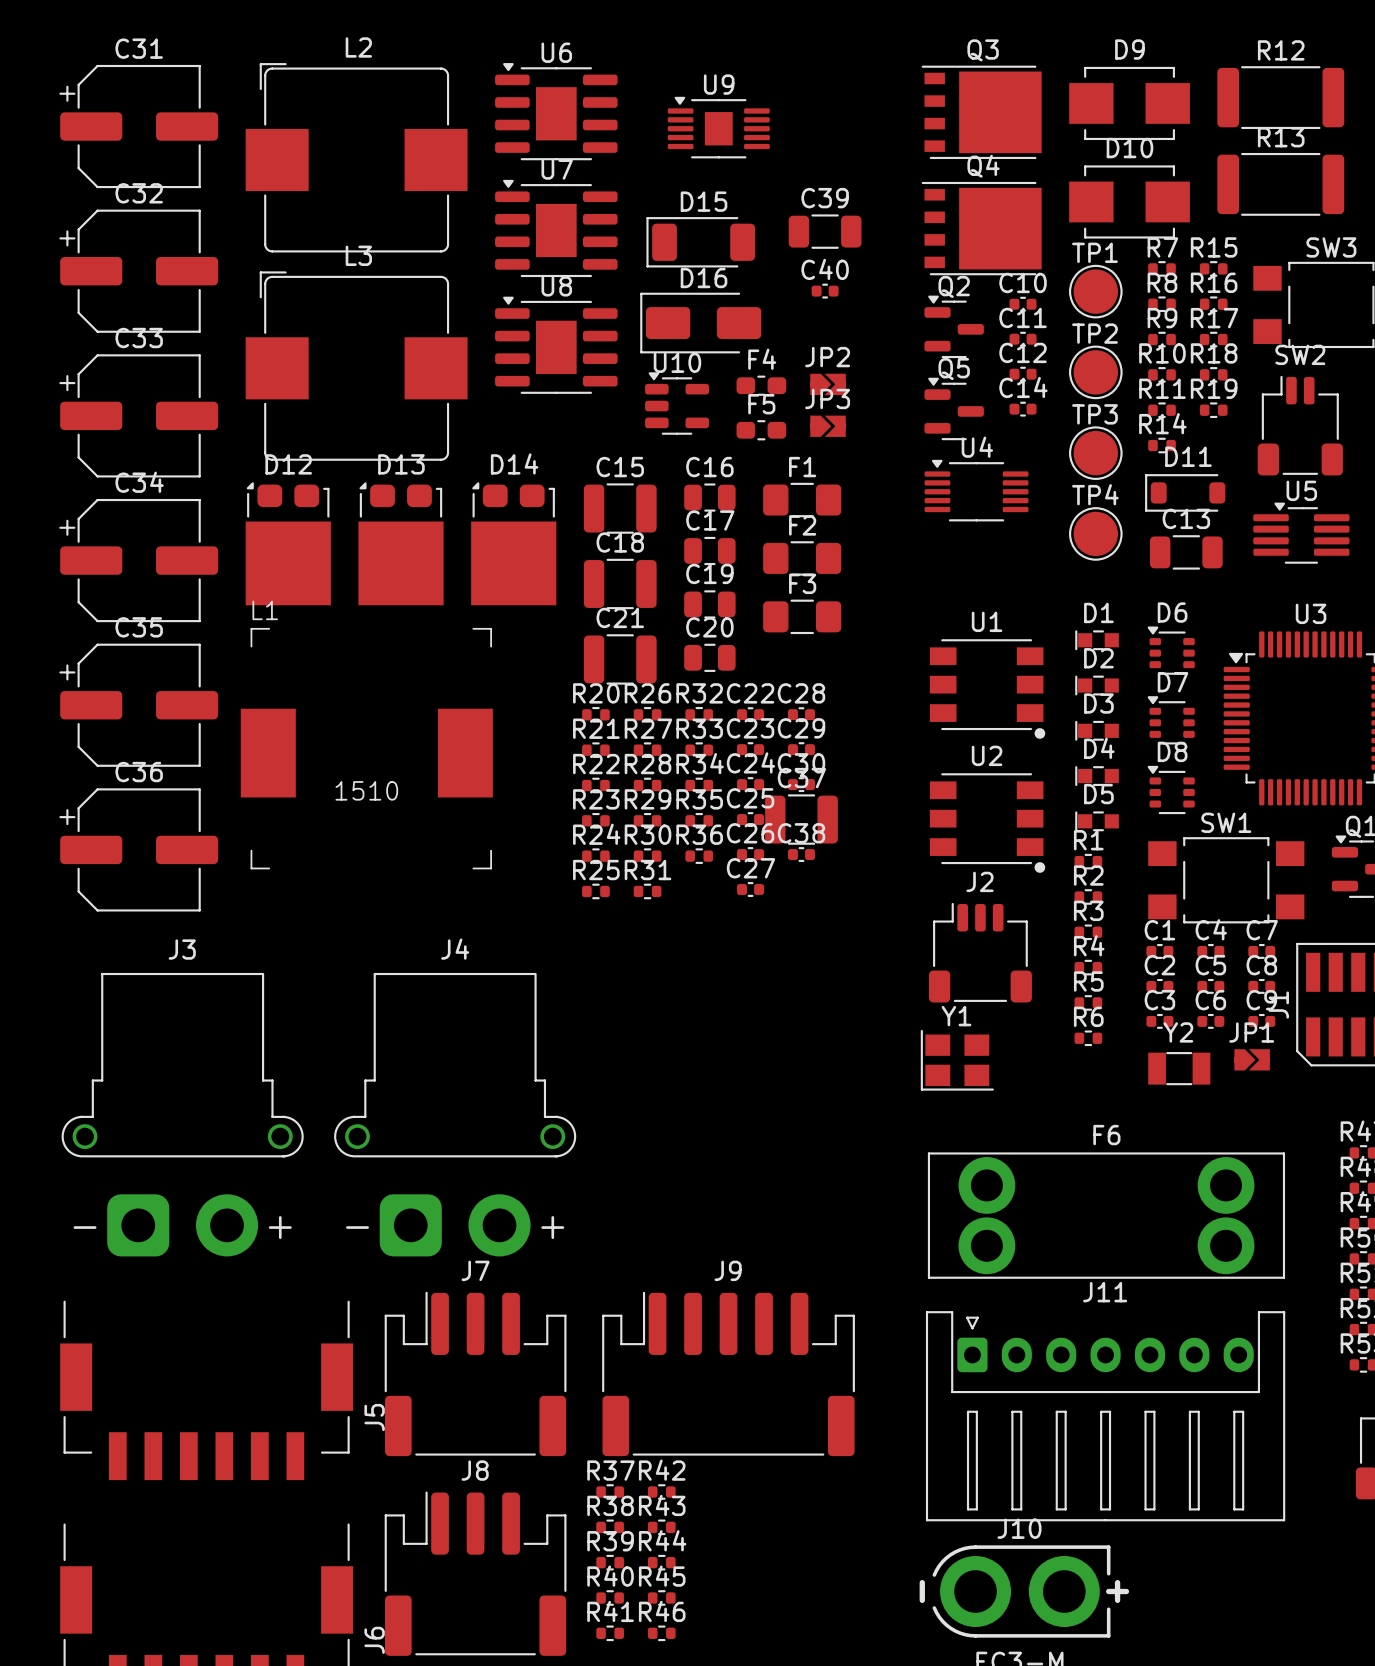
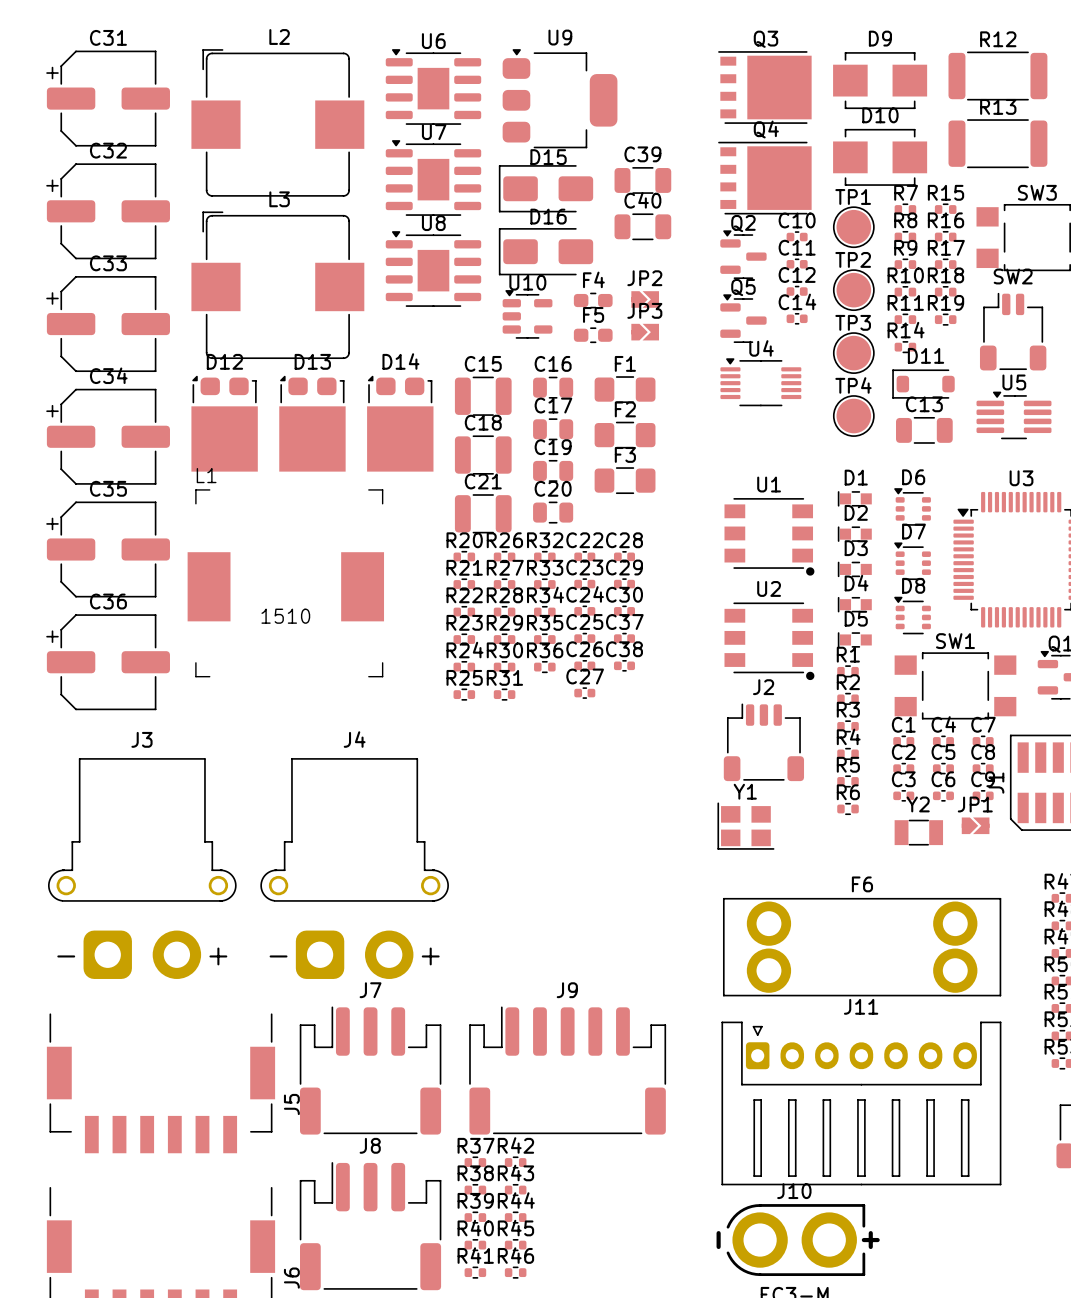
U9 footprint: [667, 96, 770, 159] -> [502, 49, 618, 149]
D15 footprint: [646, 217, 756, 268] -> [498, 165, 594, 213]
C40 footprint: [811, 283, 839, 299] -> [614, 213, 672, 241]
C37 footprint: [765, 794, 838, 845] -> [613, 632, 636, 645]

